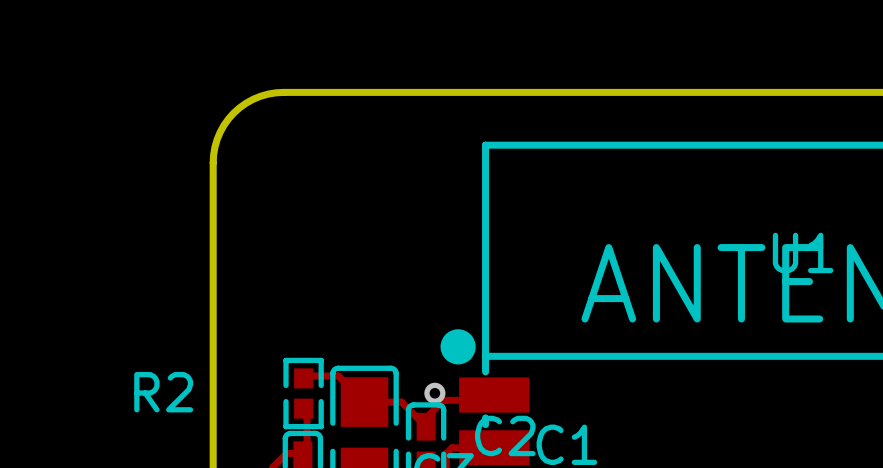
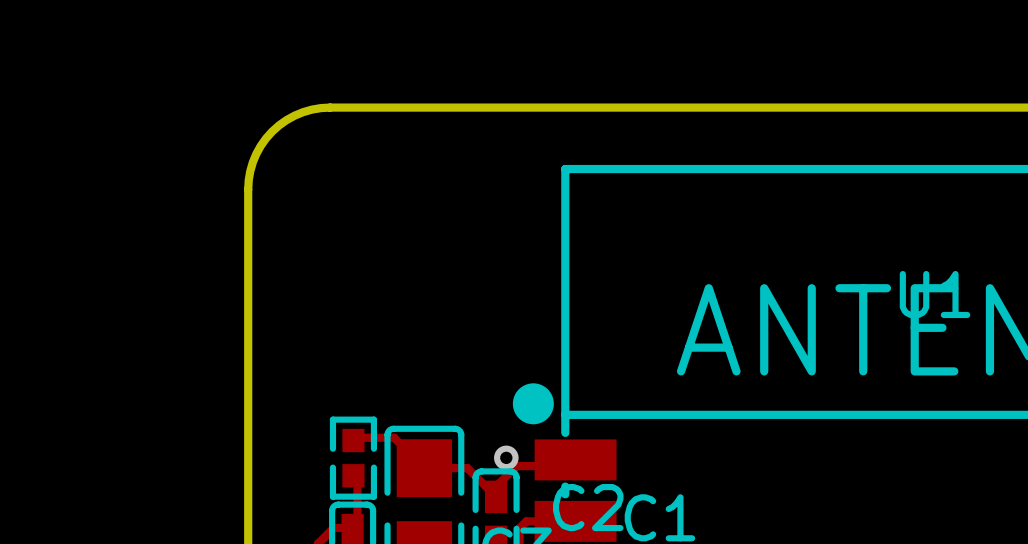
R2 name: R2 (163, 392) -> none

